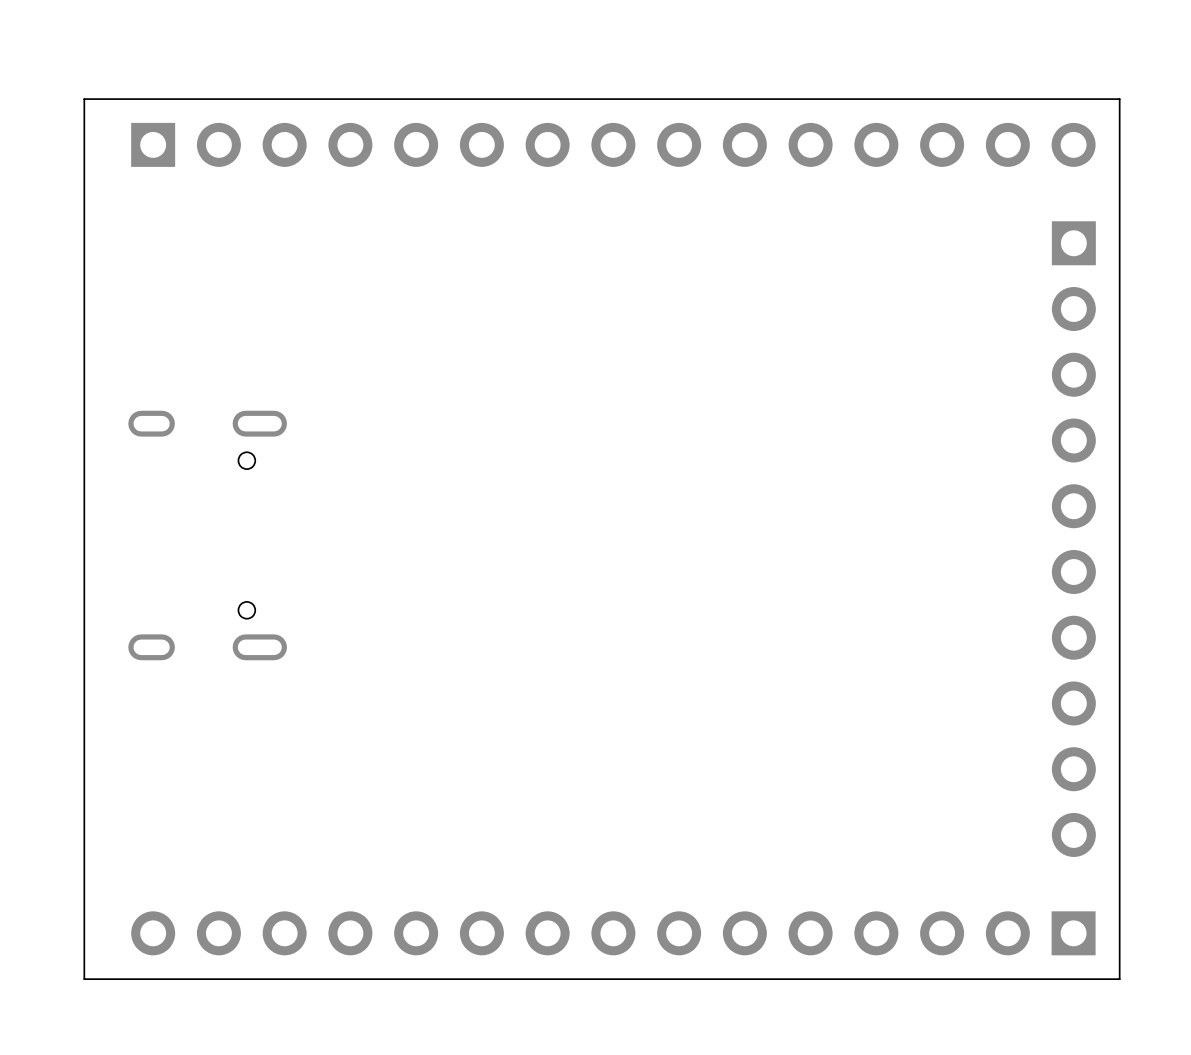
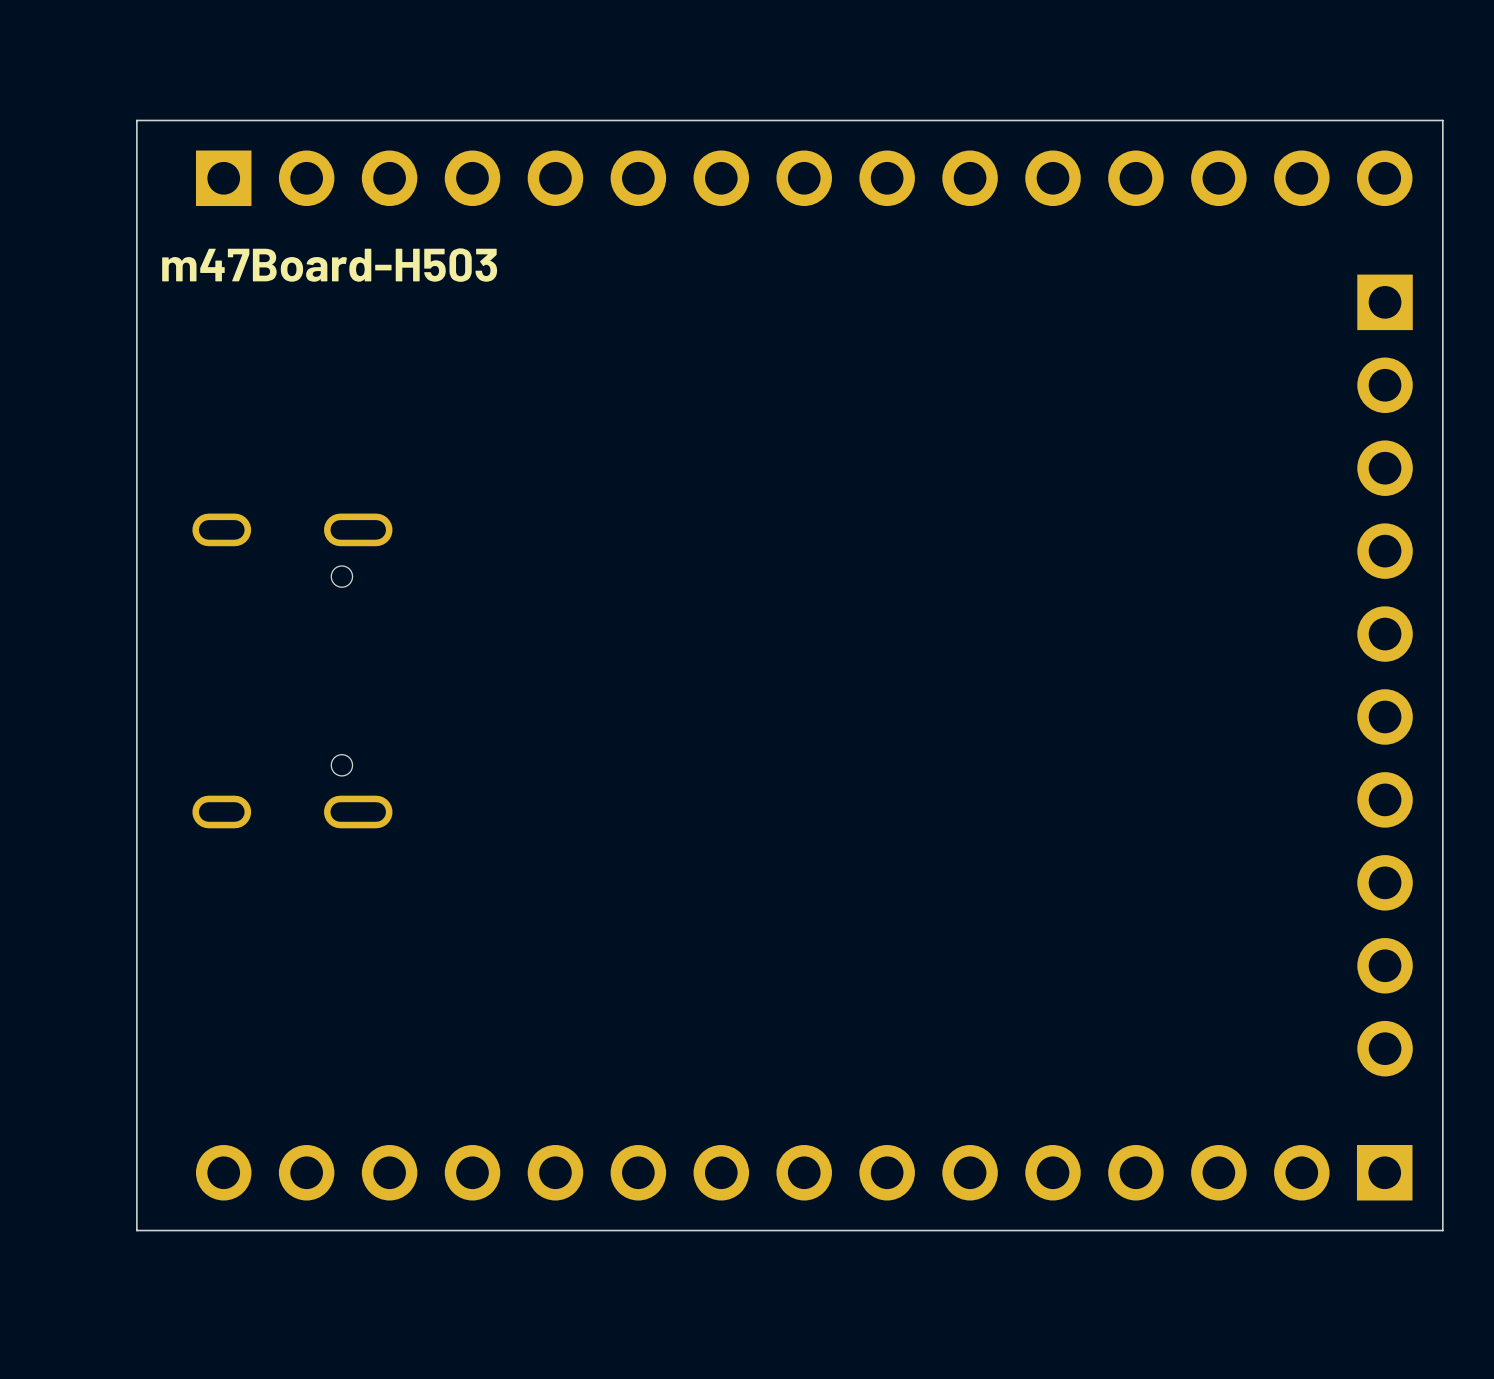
text: none -> m47Board-H503 (329, 265)

